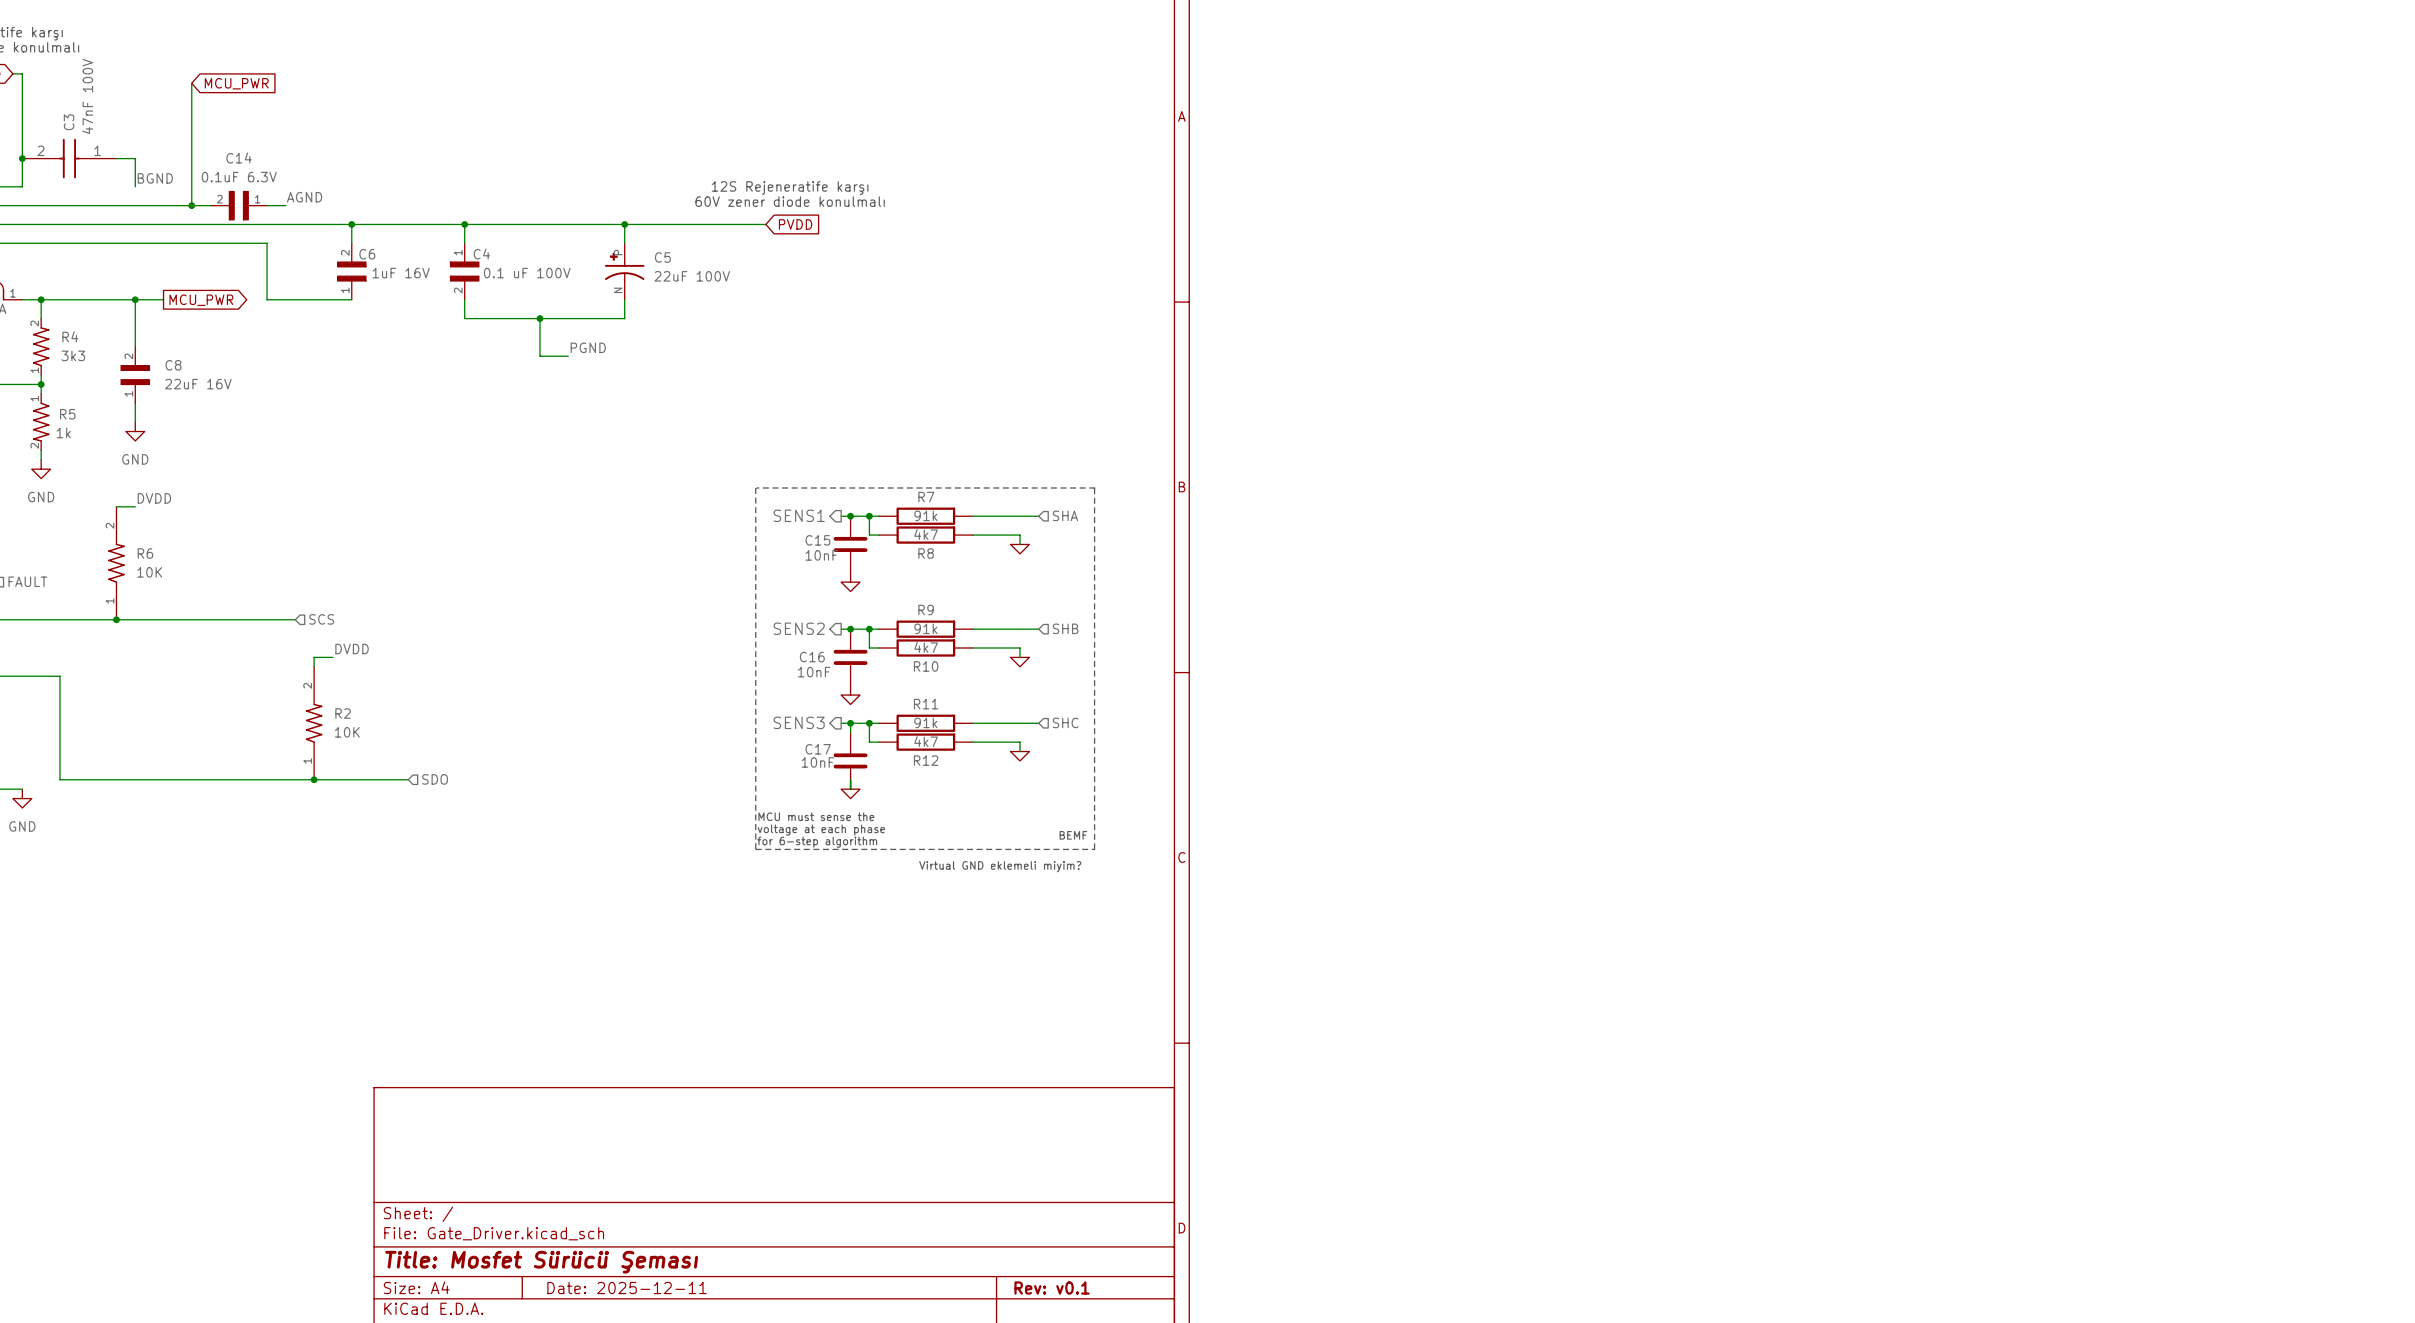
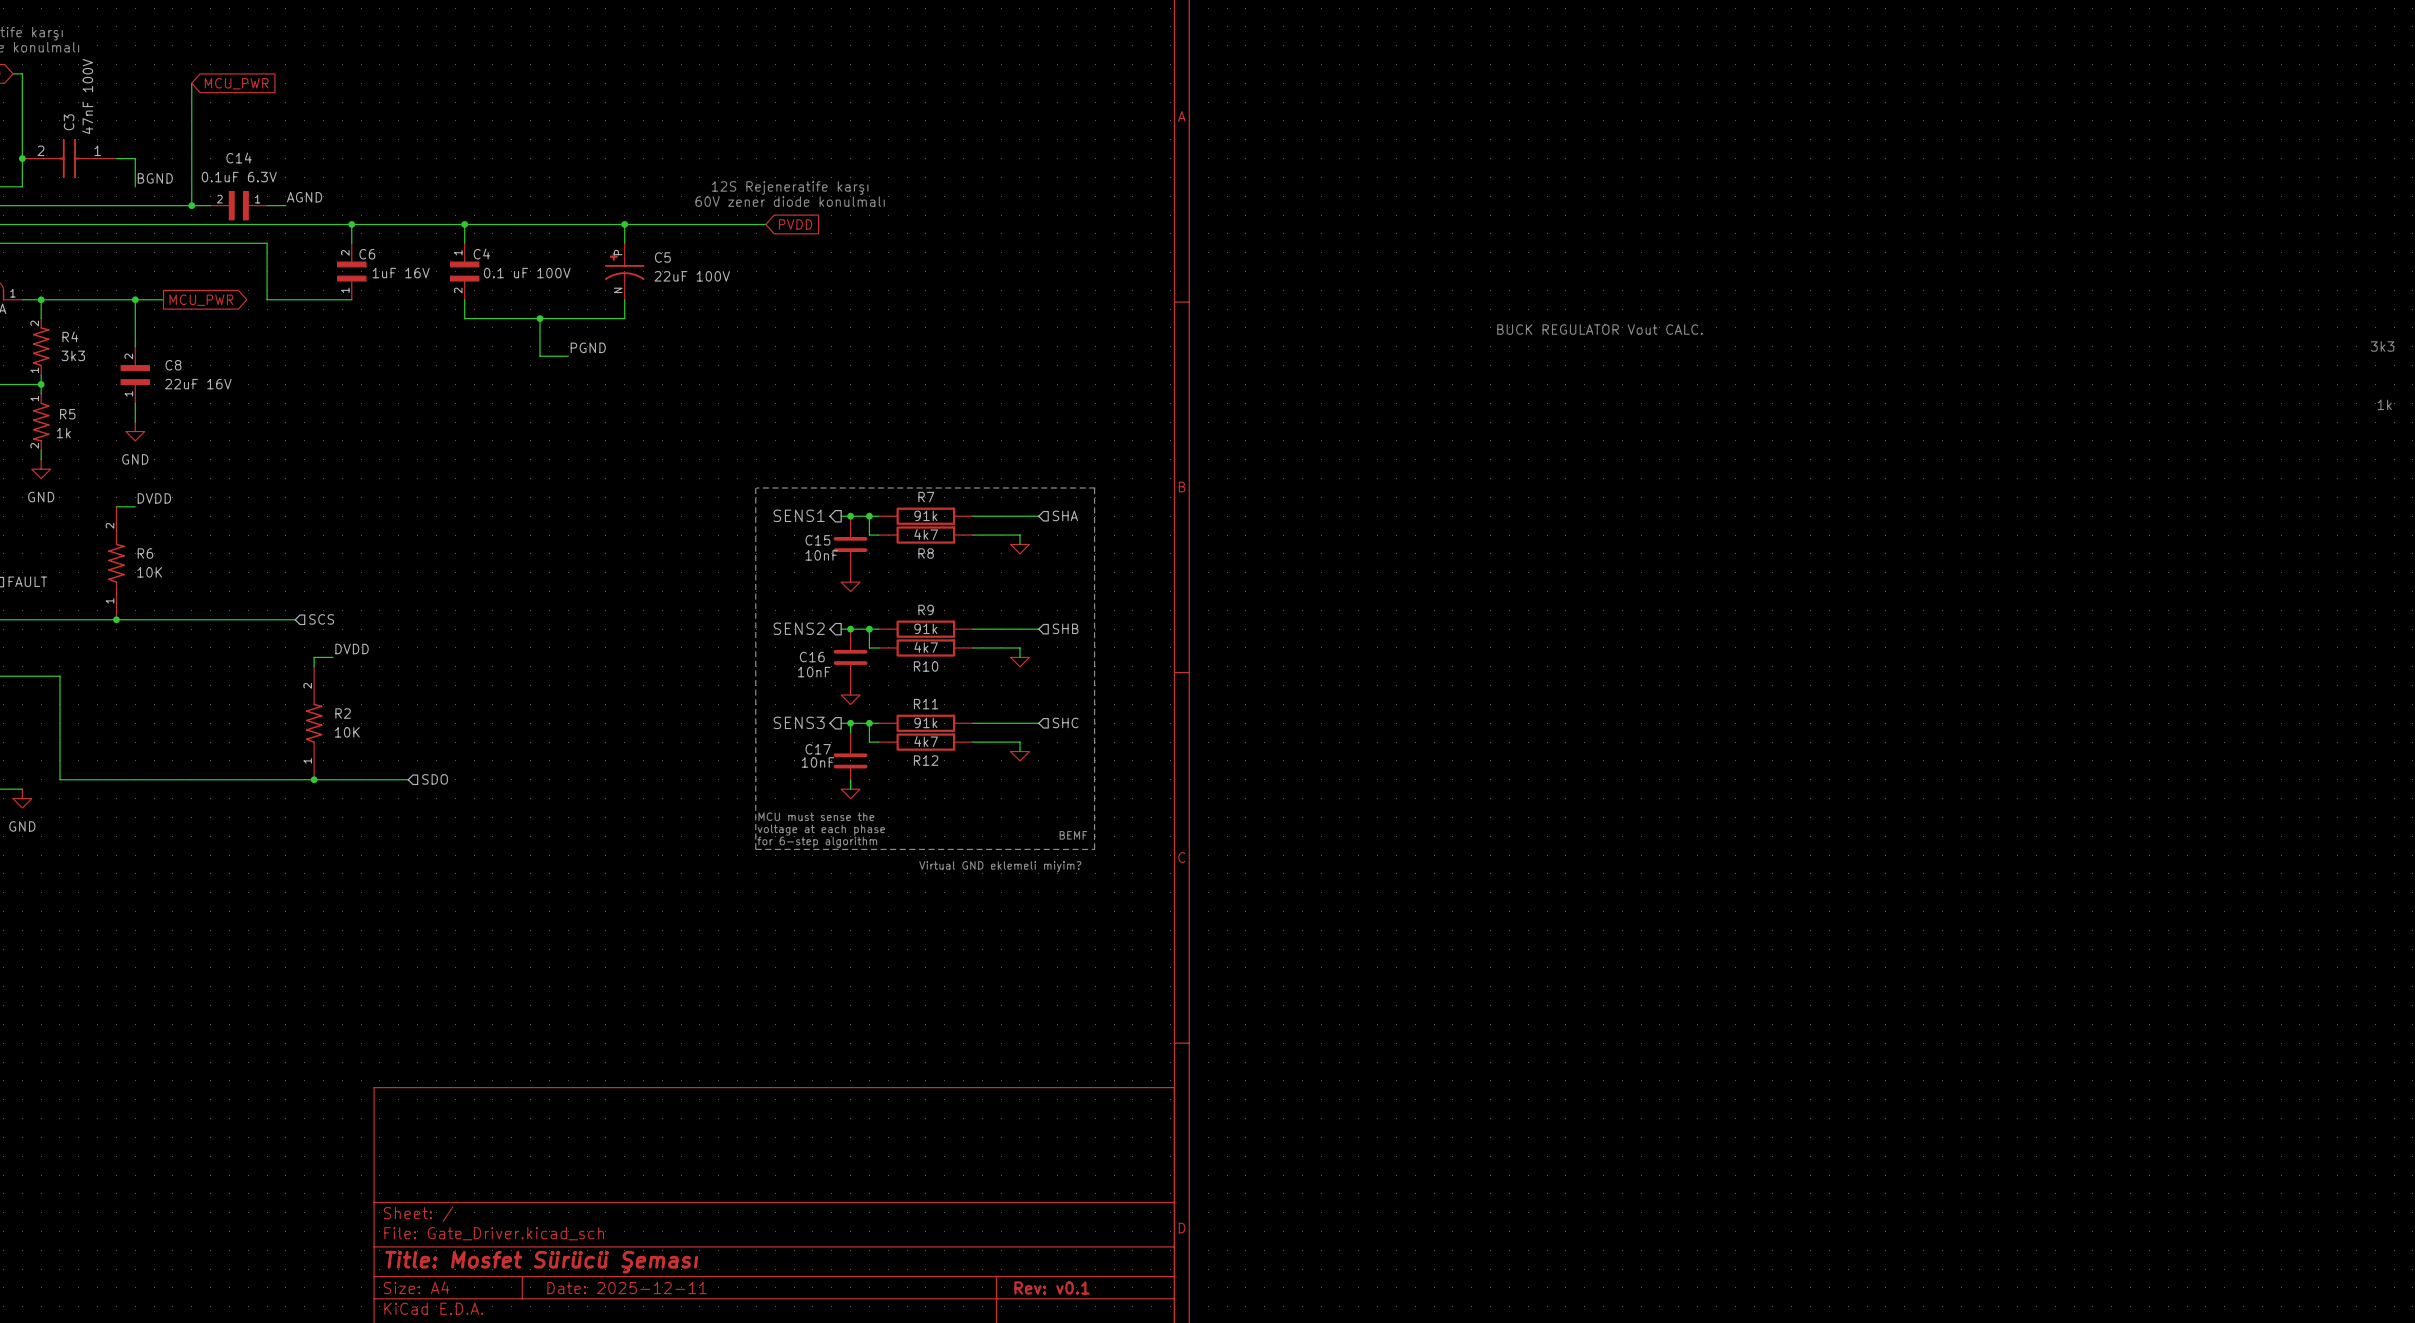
text: none -> BUCK REGULATOR Vout CALC. (1599, 329)
text: none -> 3k3 (2382, 346)
text: none -> 1k (2384, 404)

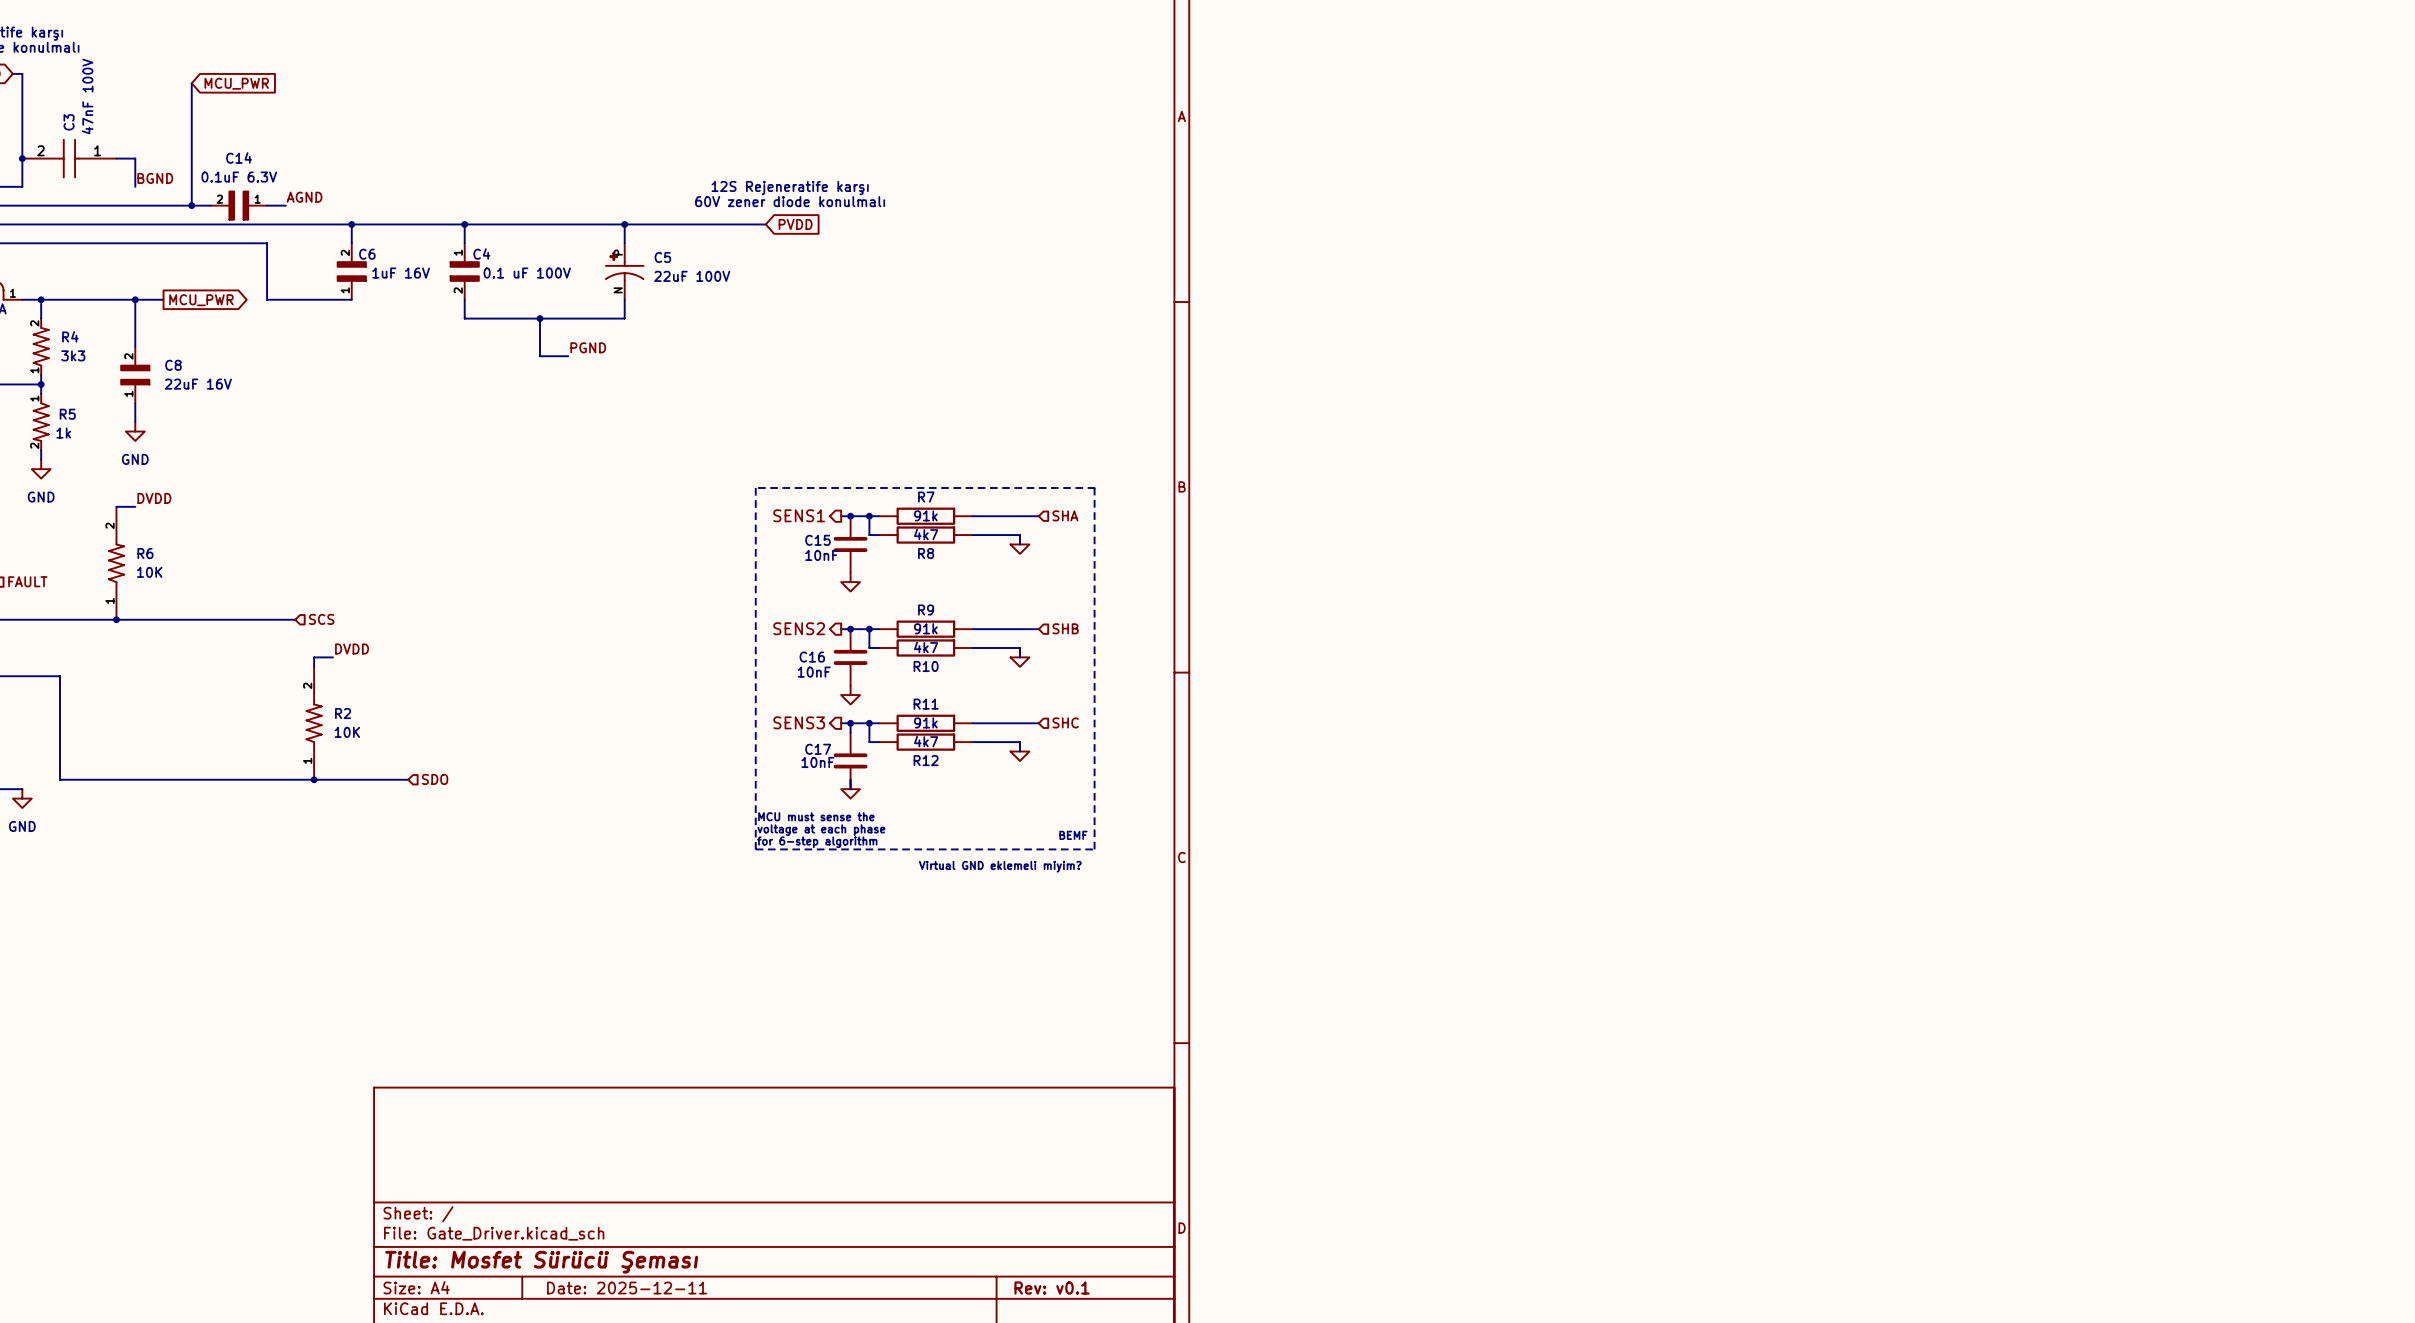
text: BUCK REGULATOR Vout CALC. (1599, 329) -> none
text: 3k3 (2382, 346) -> none
text: 1k (2384, 404) -> none

